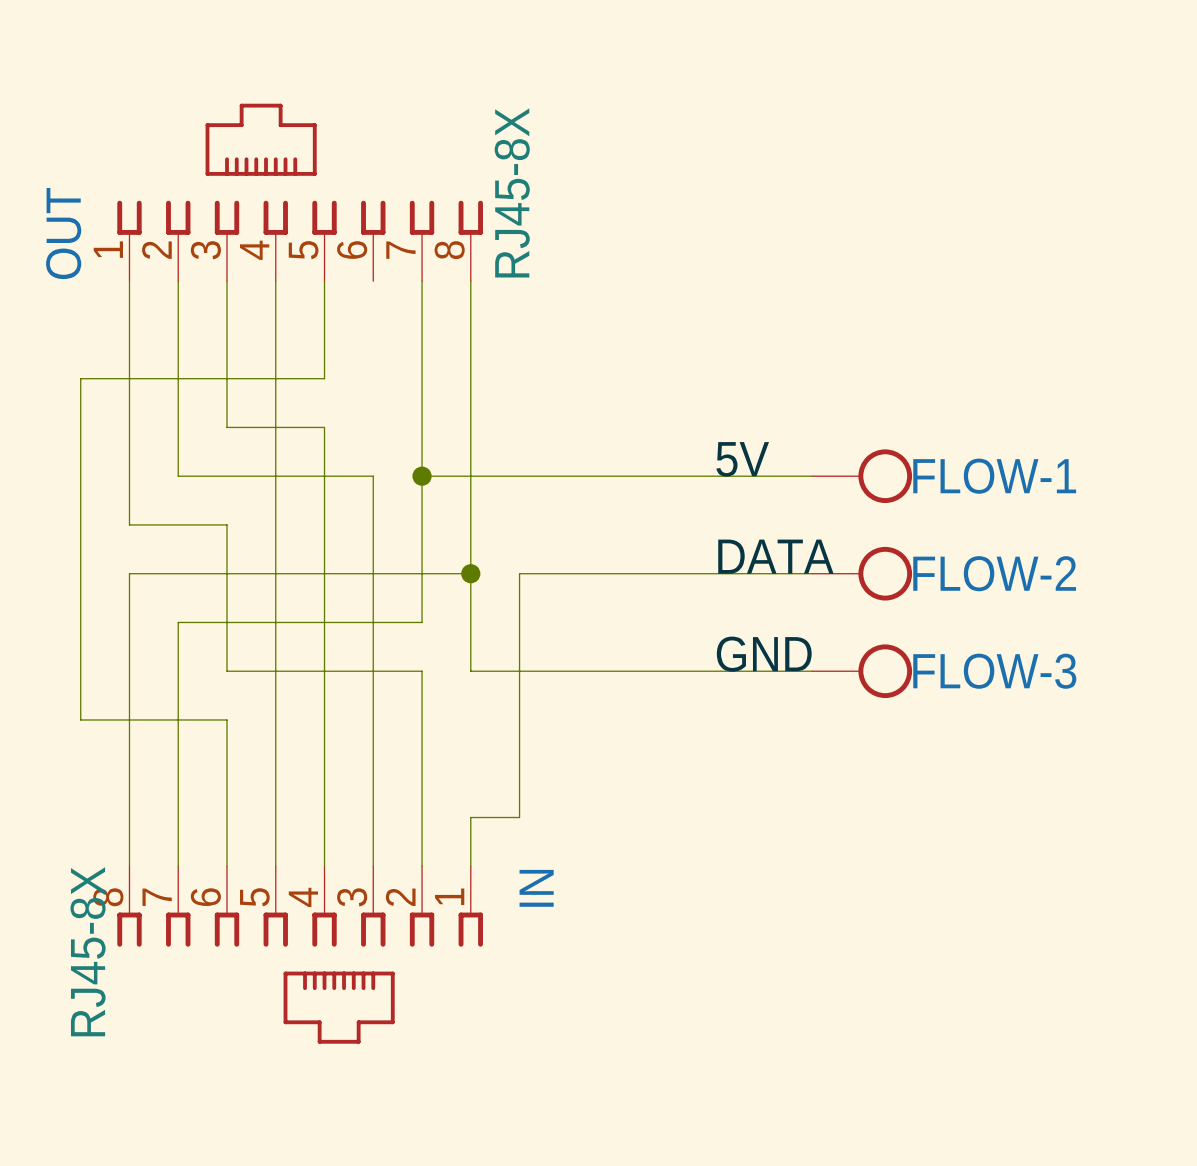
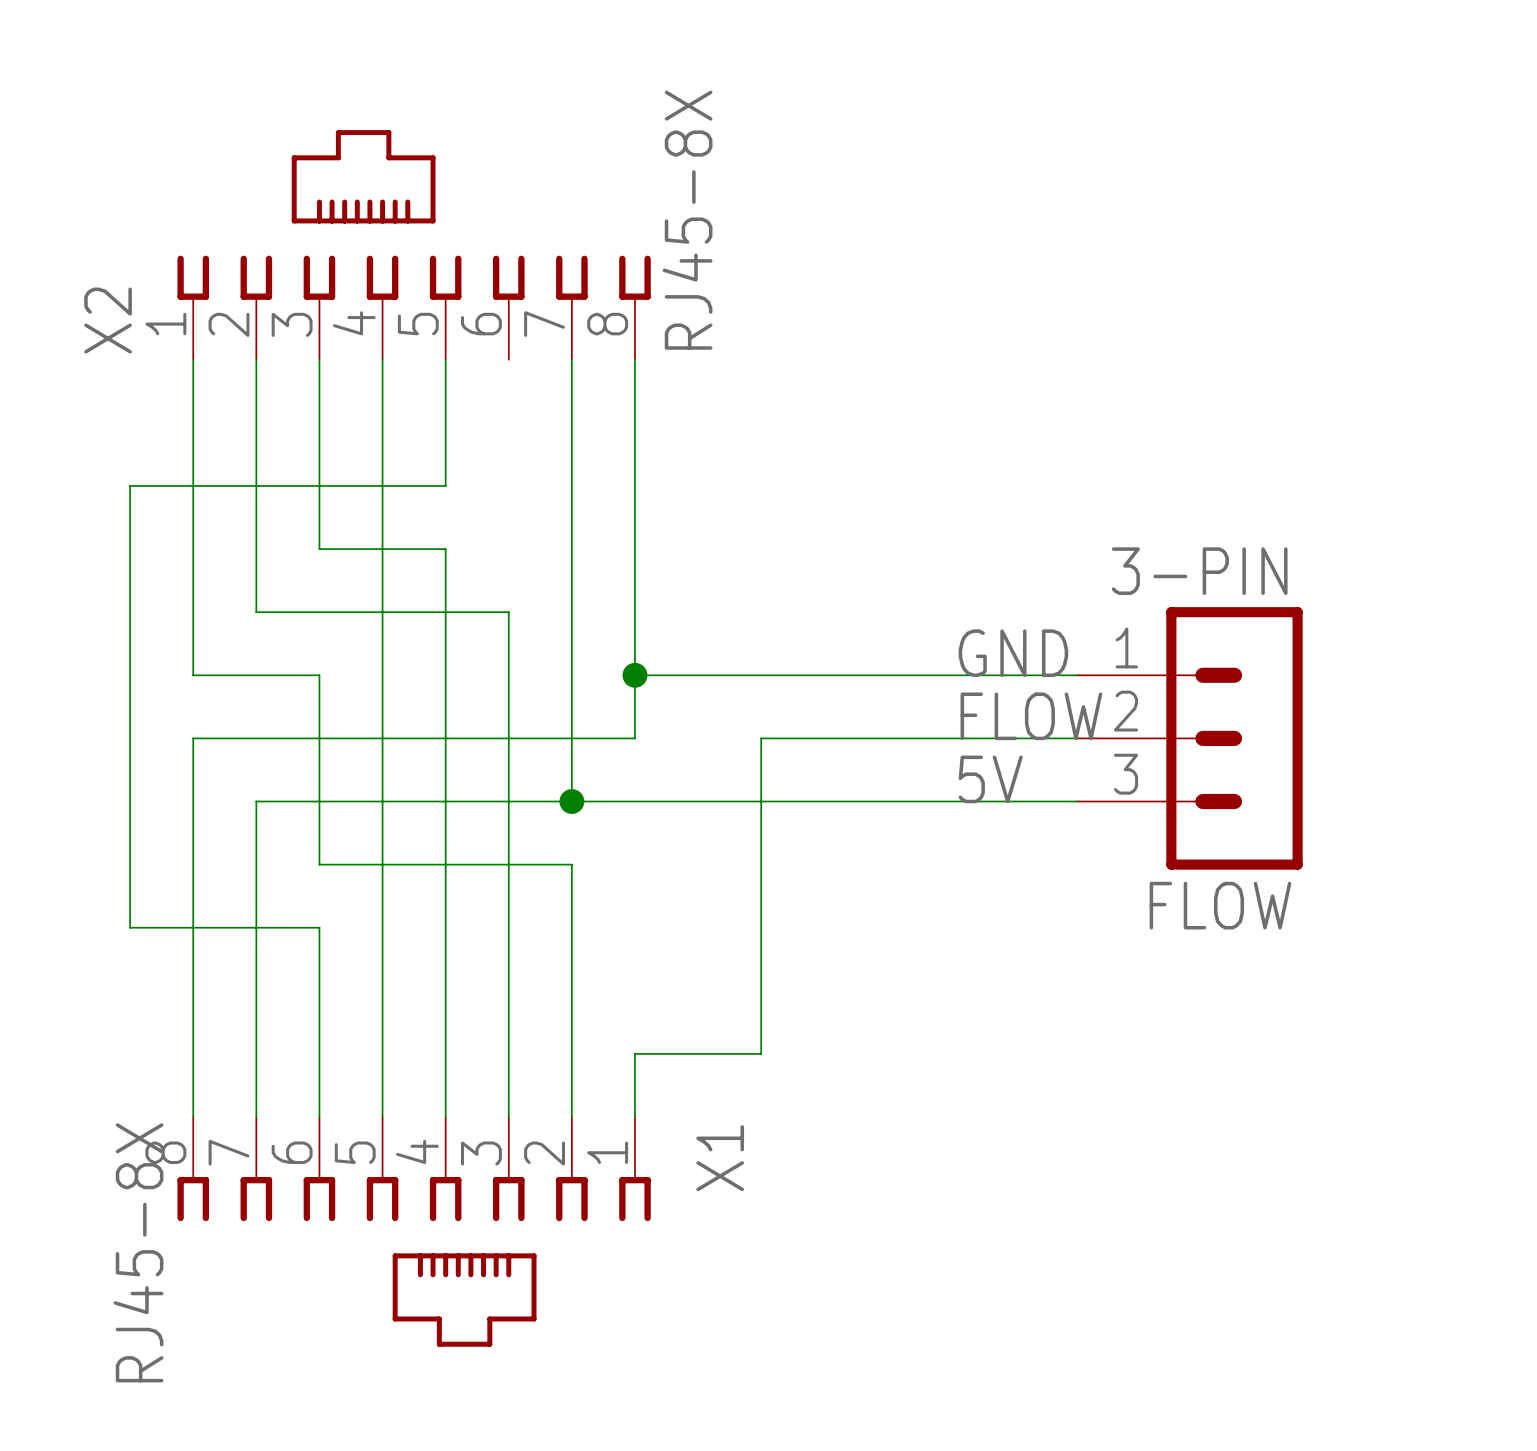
OUT name: OUT (63, 233) -> X2 (108, 320)
label position: 5V (742, 459) -> 5V (990, 779)
wire: (422, 476) (812, 476) -> (571, 801) (1076, 801)
junction: (422, 476) -> none
FLOW-1: (862, 476) -> none
wire: none -> (634, 675) (1076, 675)
junction: none -> (634, 675)
label: DATA (775, 556) -> FLOW (1031, 716)
wire: (470, 573) (470, 671) (812, 671) -> none
junction: (470, 573) -> none
wire: (568, 573) (519, 573) (519, 817) -> (761, 738) (761, 1053) (698, 1053)
FLOW-2: (862, 573) -> none
FLOW: none -> 3-PIN (1189, 738)
junction: none -> (571, 801)
label position: GND (764, 654) -> GND (1013, 653)
FLOW-3: (862, 671) -> none
IN name: IN (536, 888) -> X1 (720, 1158)

